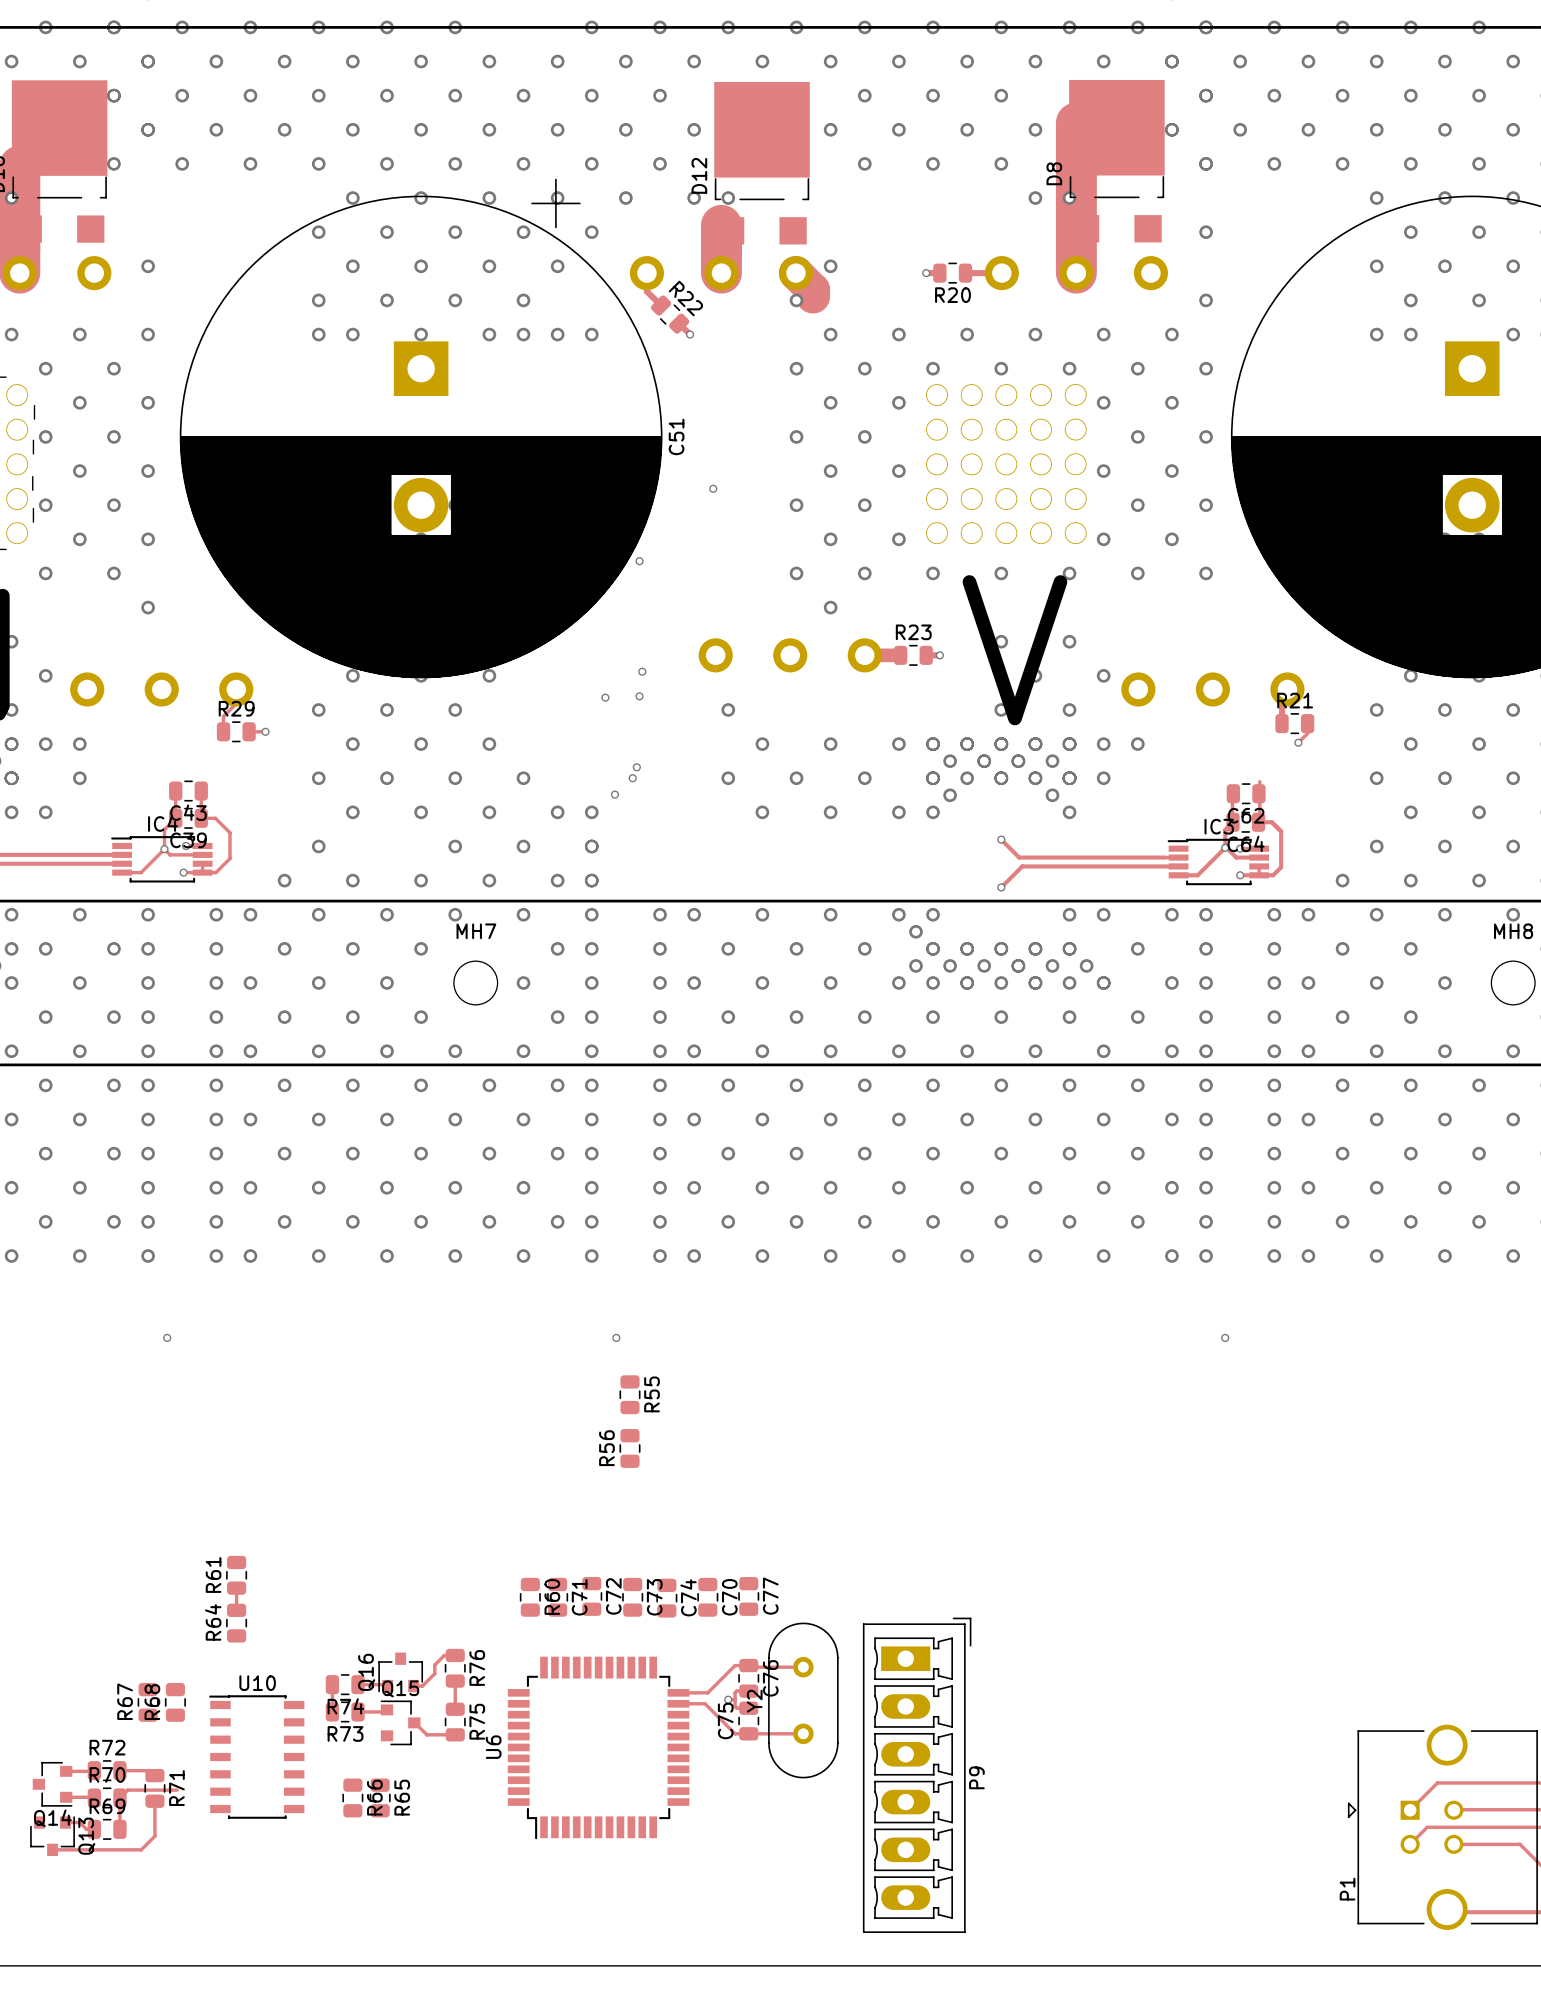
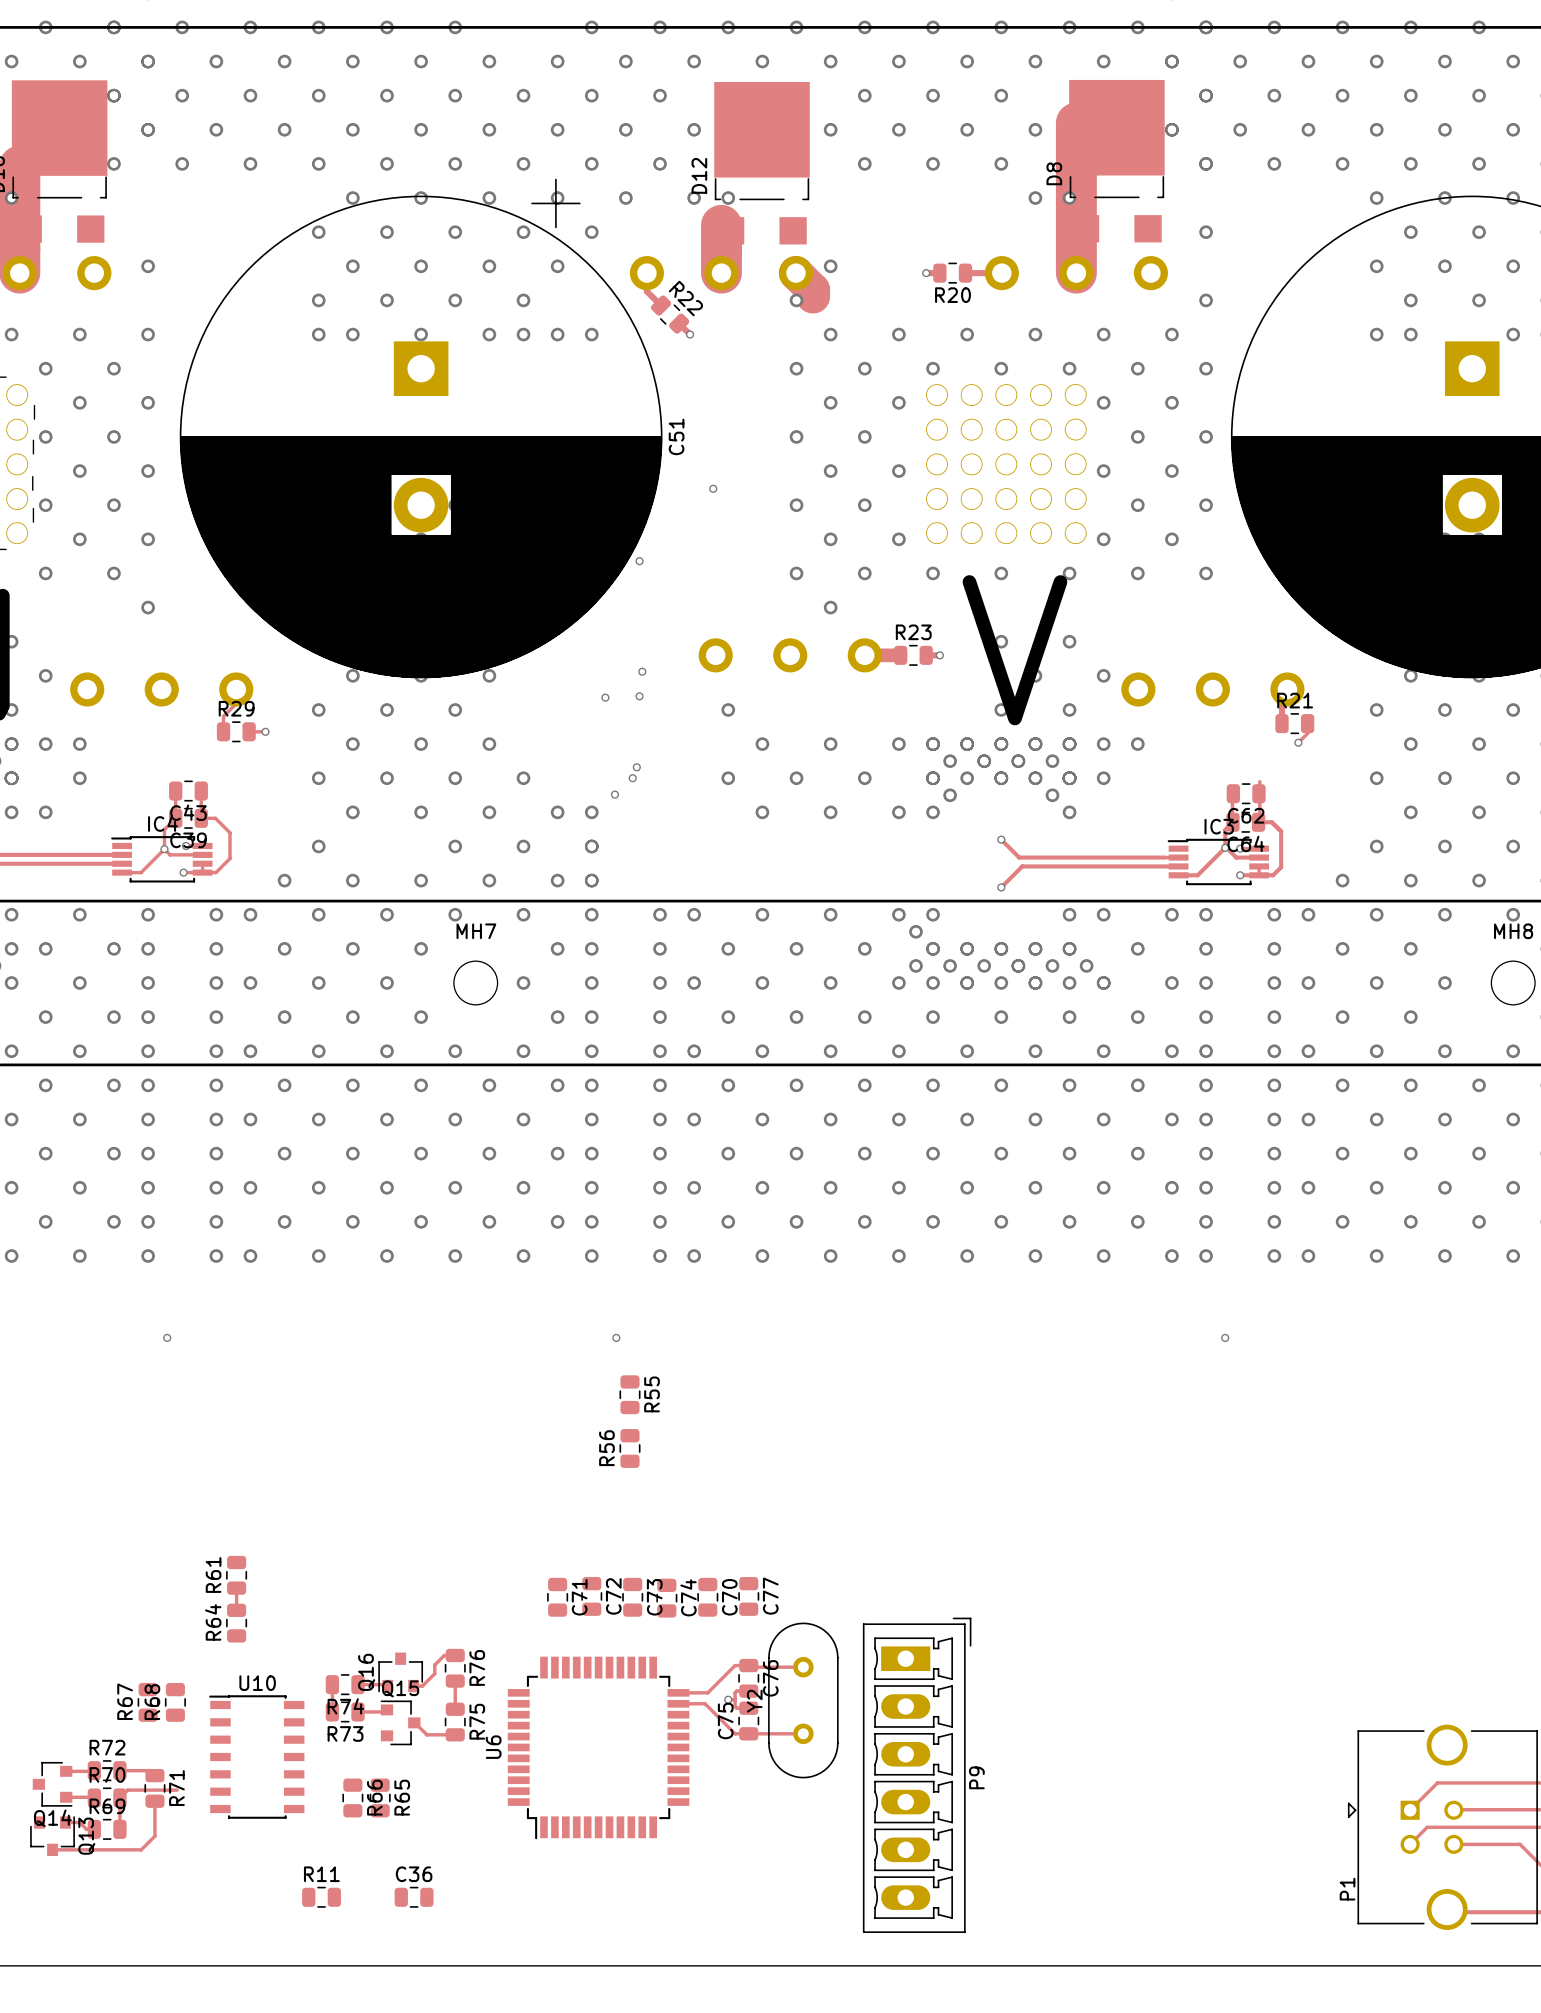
R60: (530, 1597) -> none
R11: none -> (321, 1897)
C36: none -> (414, 1897)

